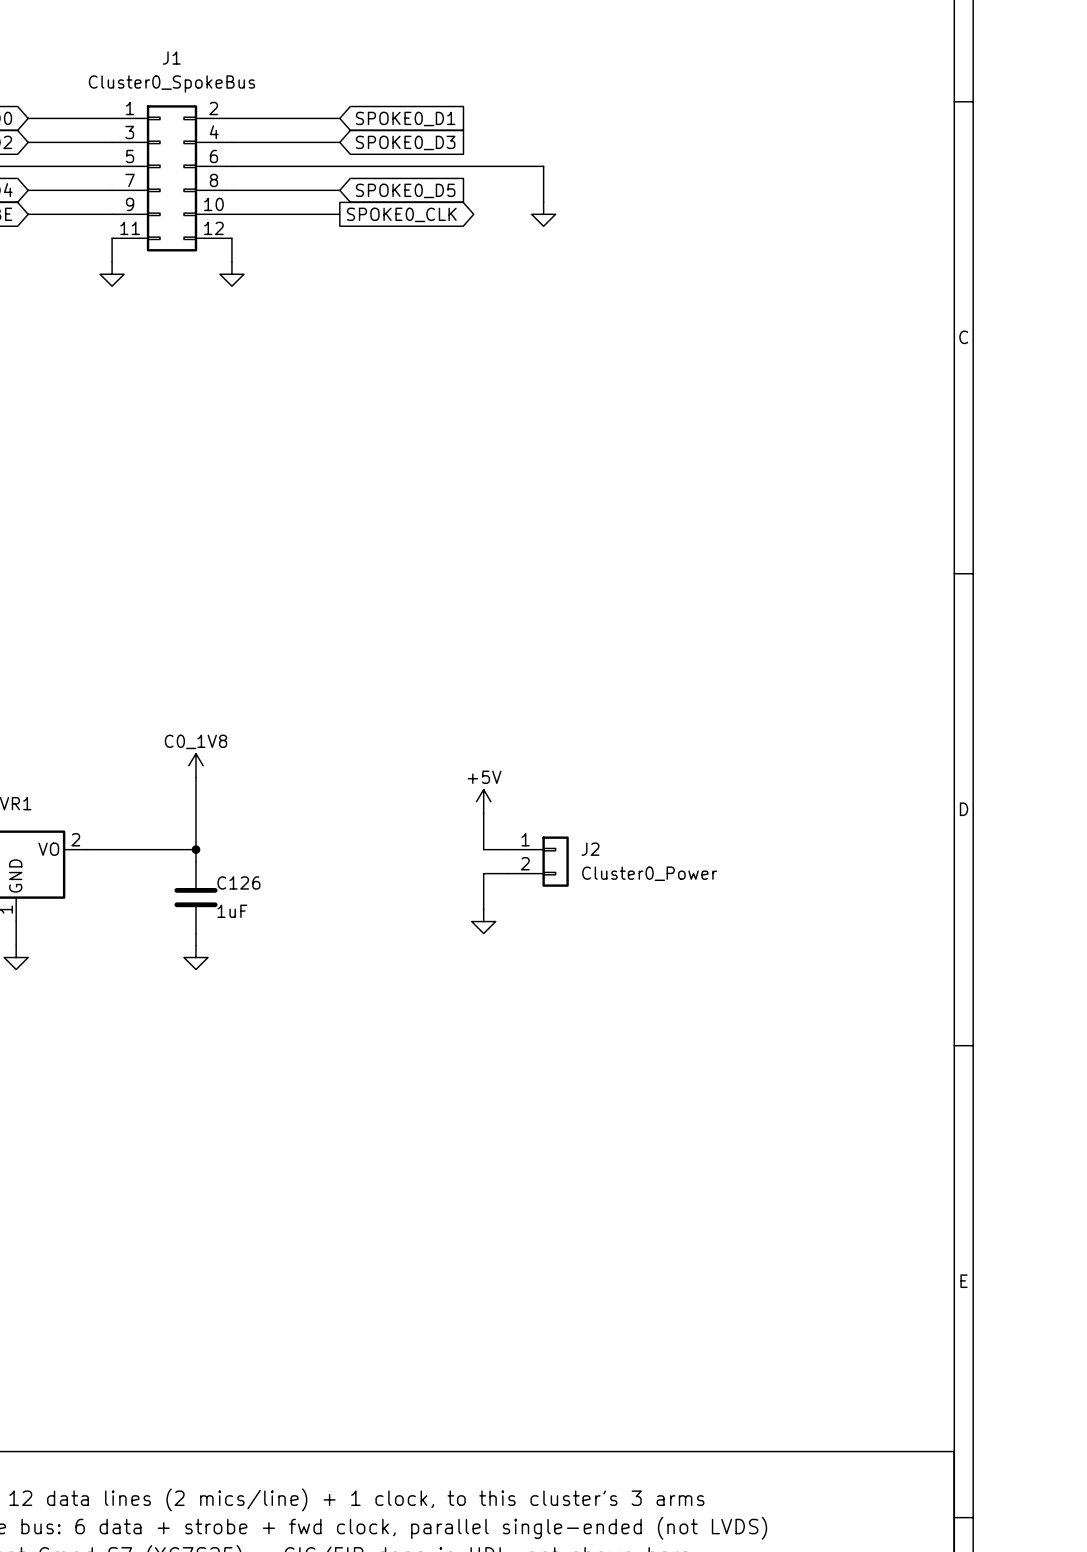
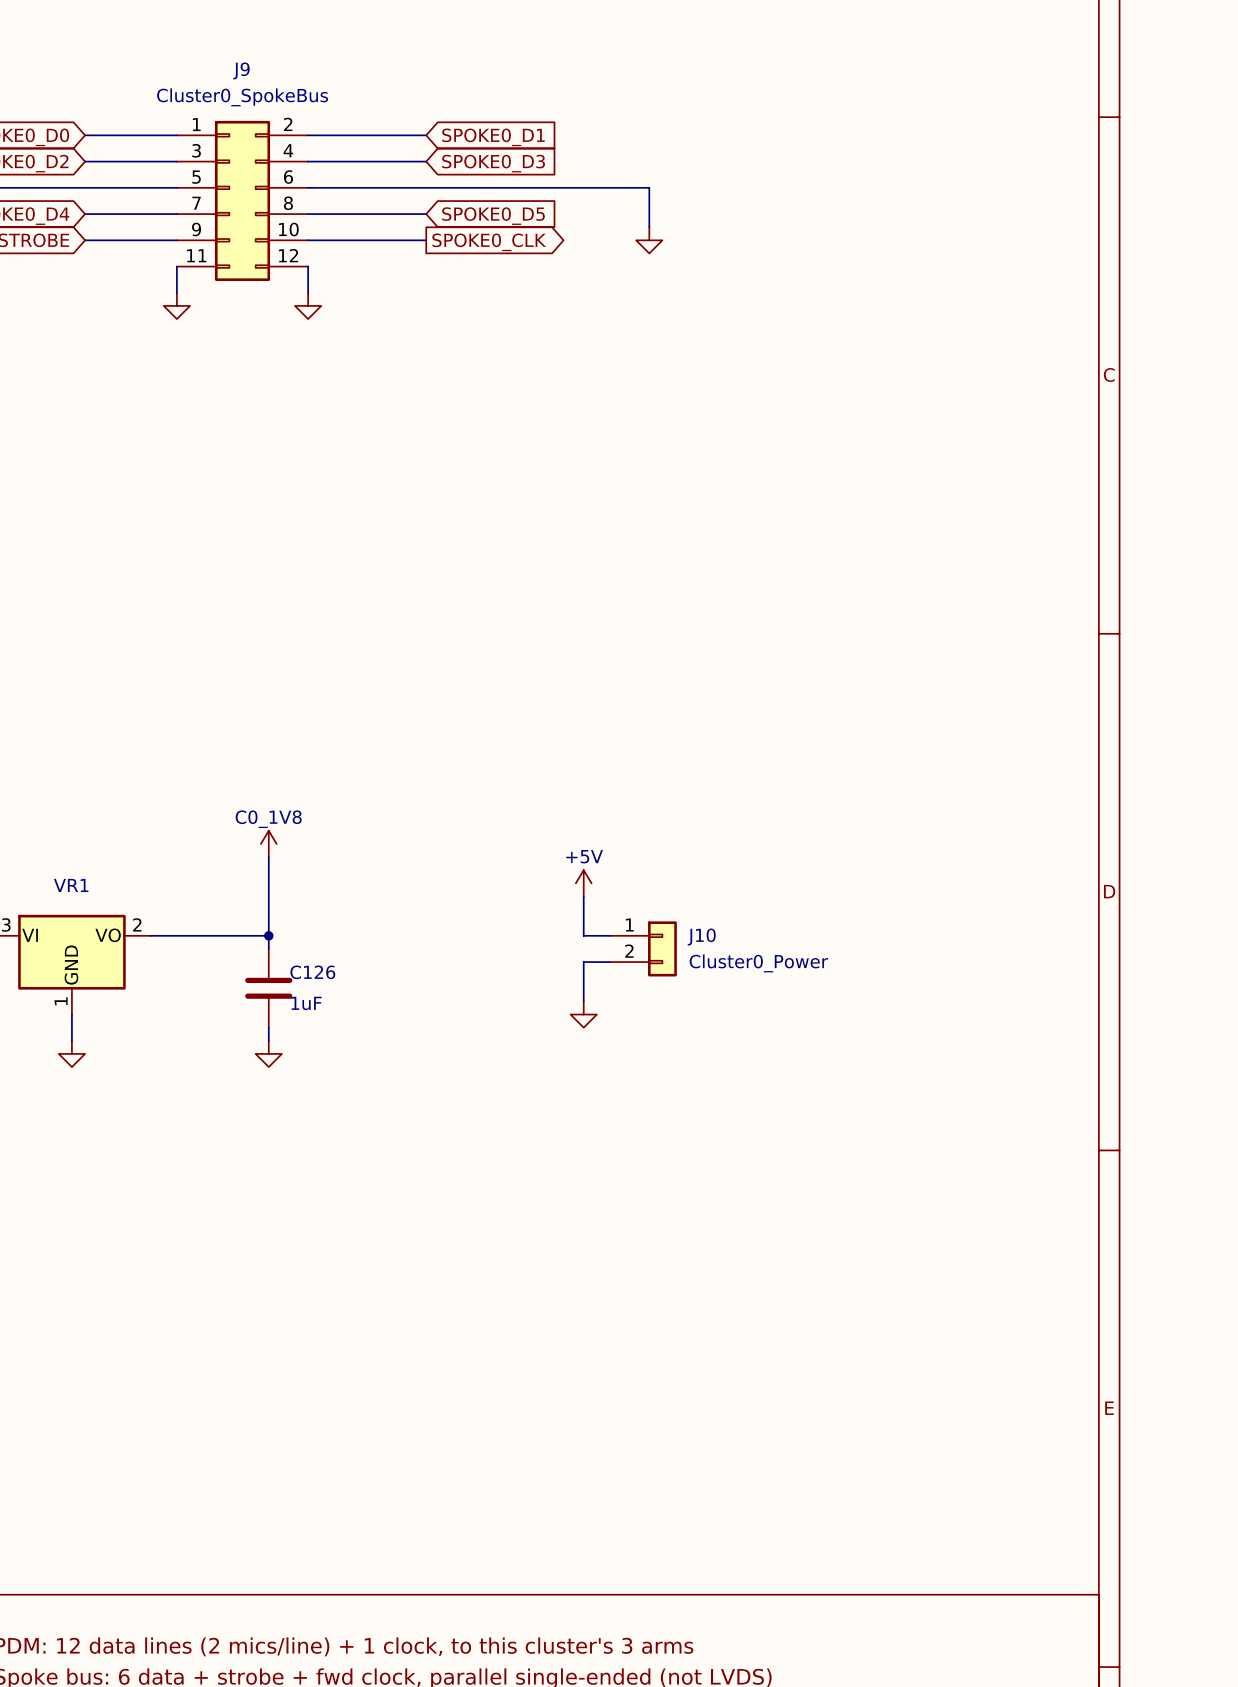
J1 name: J1 (171, 58) -> J9 (241, 70)
J2 name: J2 (590, 849) -> J10 (701, 937)

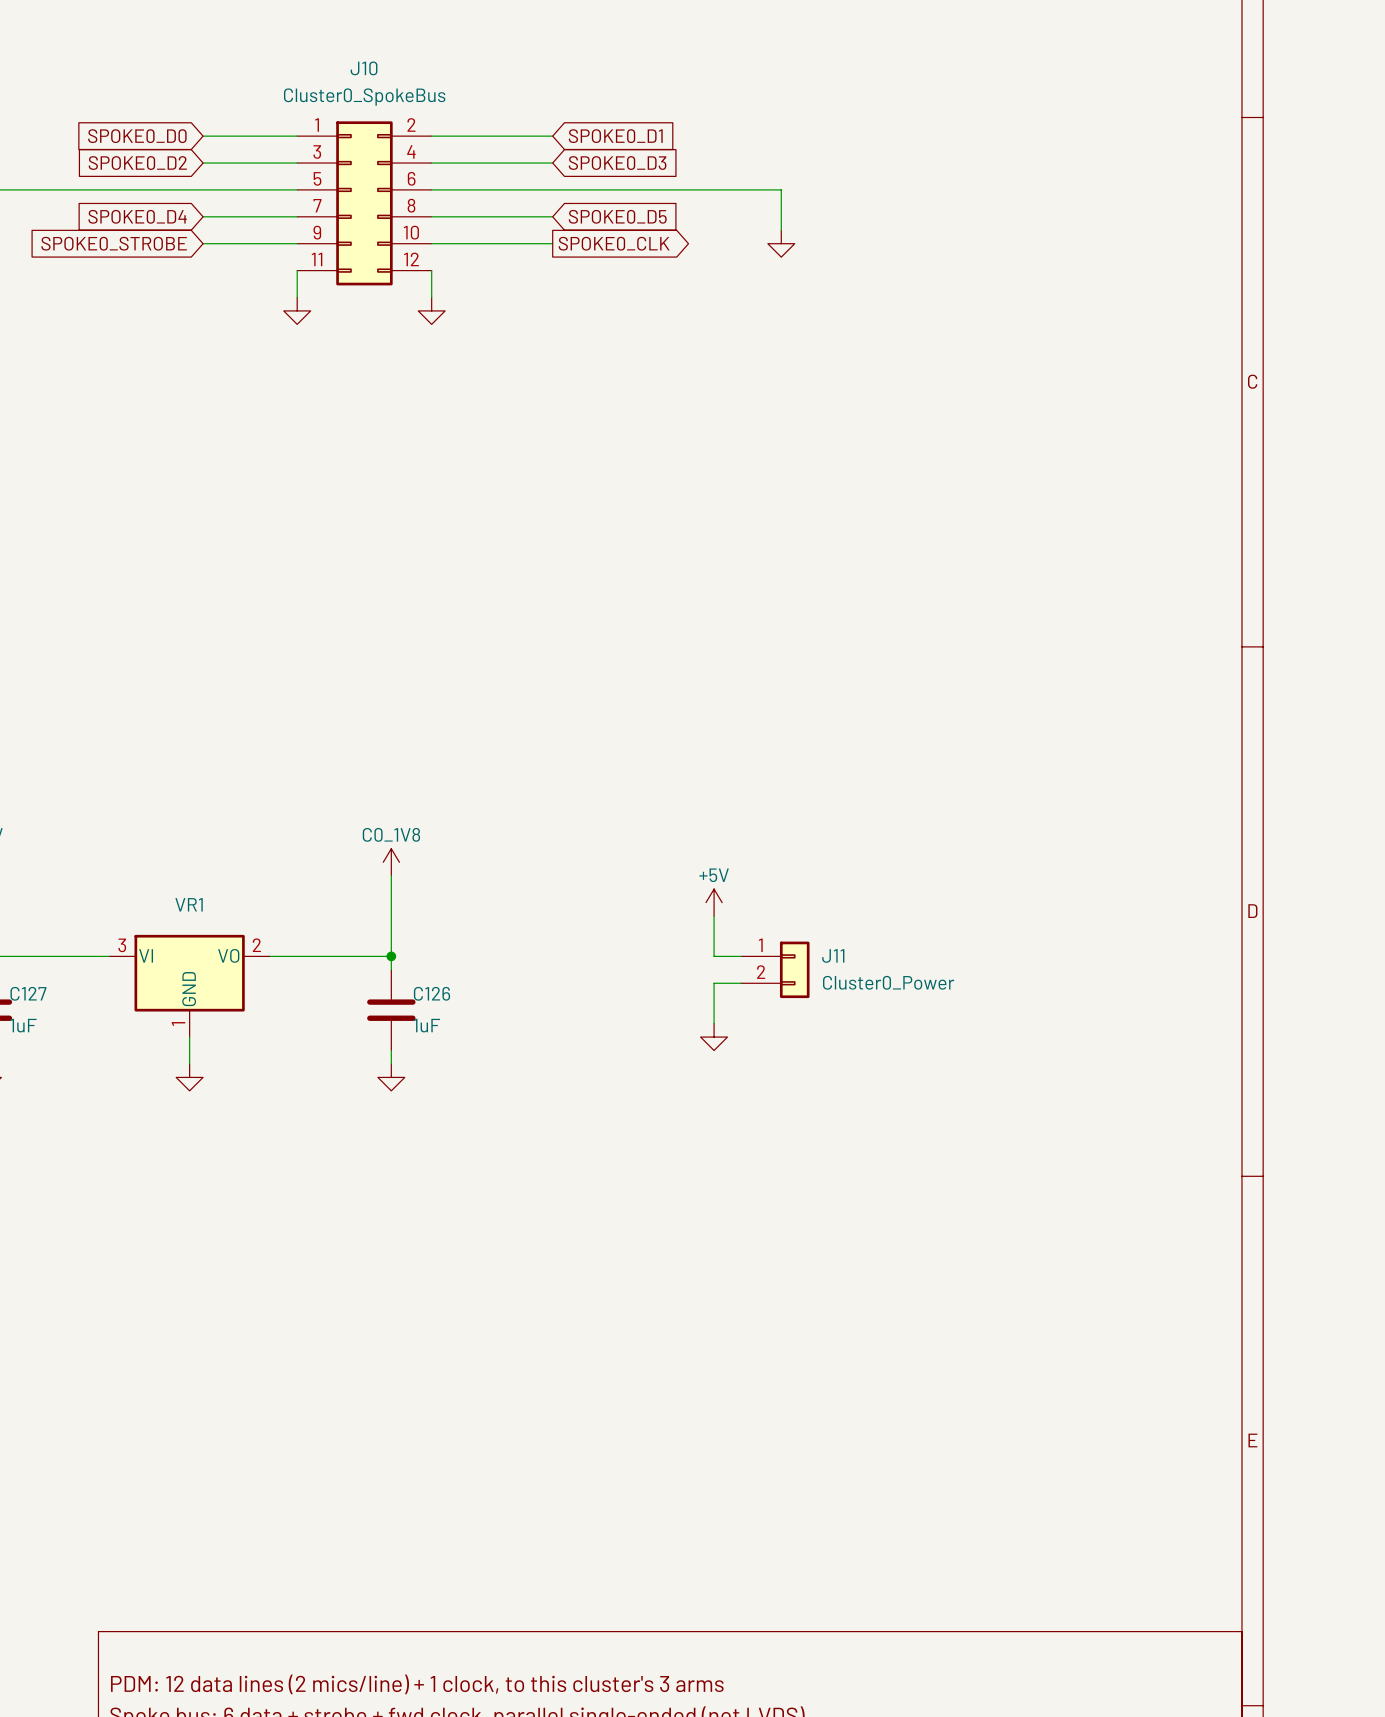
J9 name: J9 (241, 70) -> J10 (364, 68)
J10 name: J10 (701, 937) -> J11 (833, 955)

